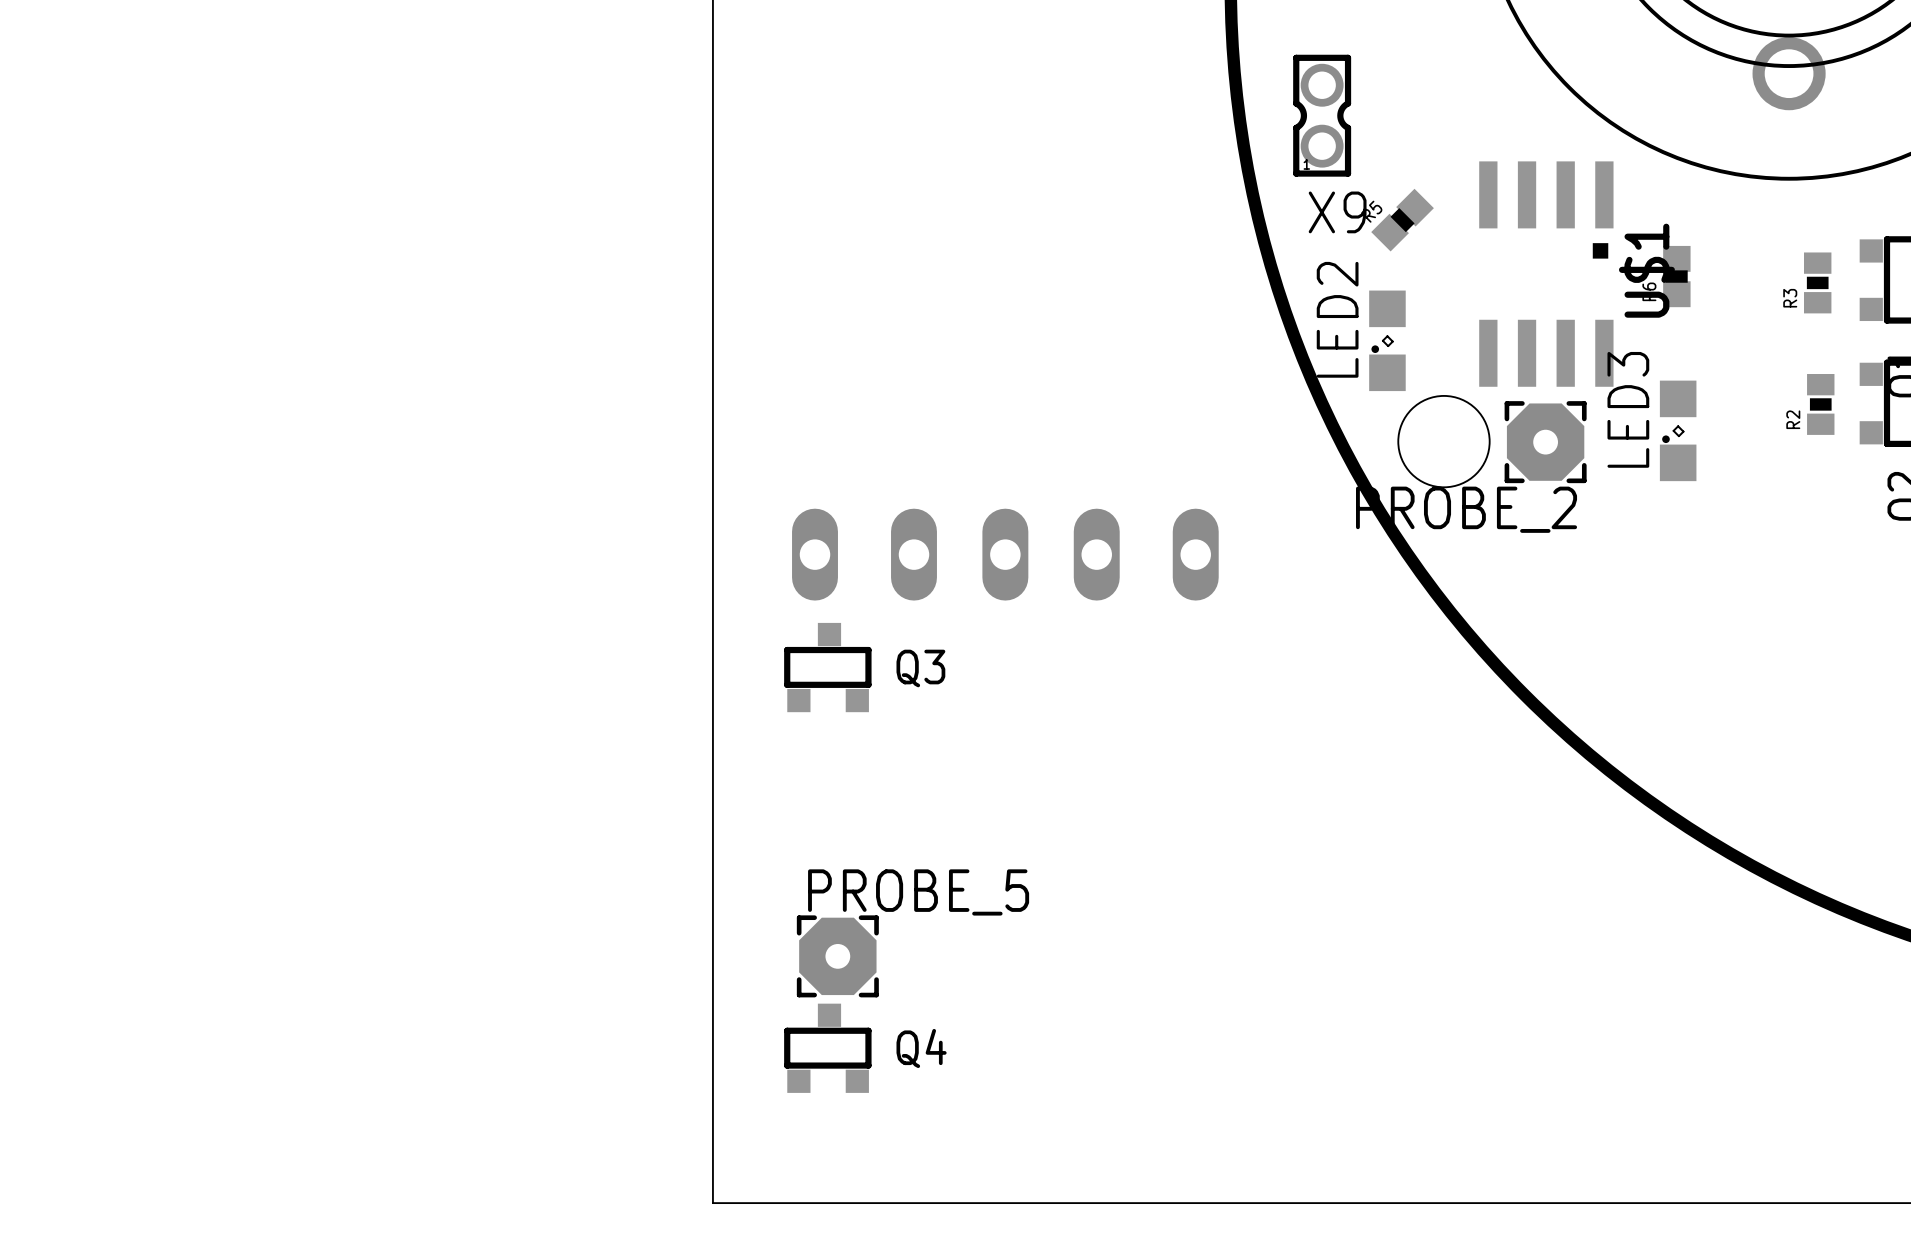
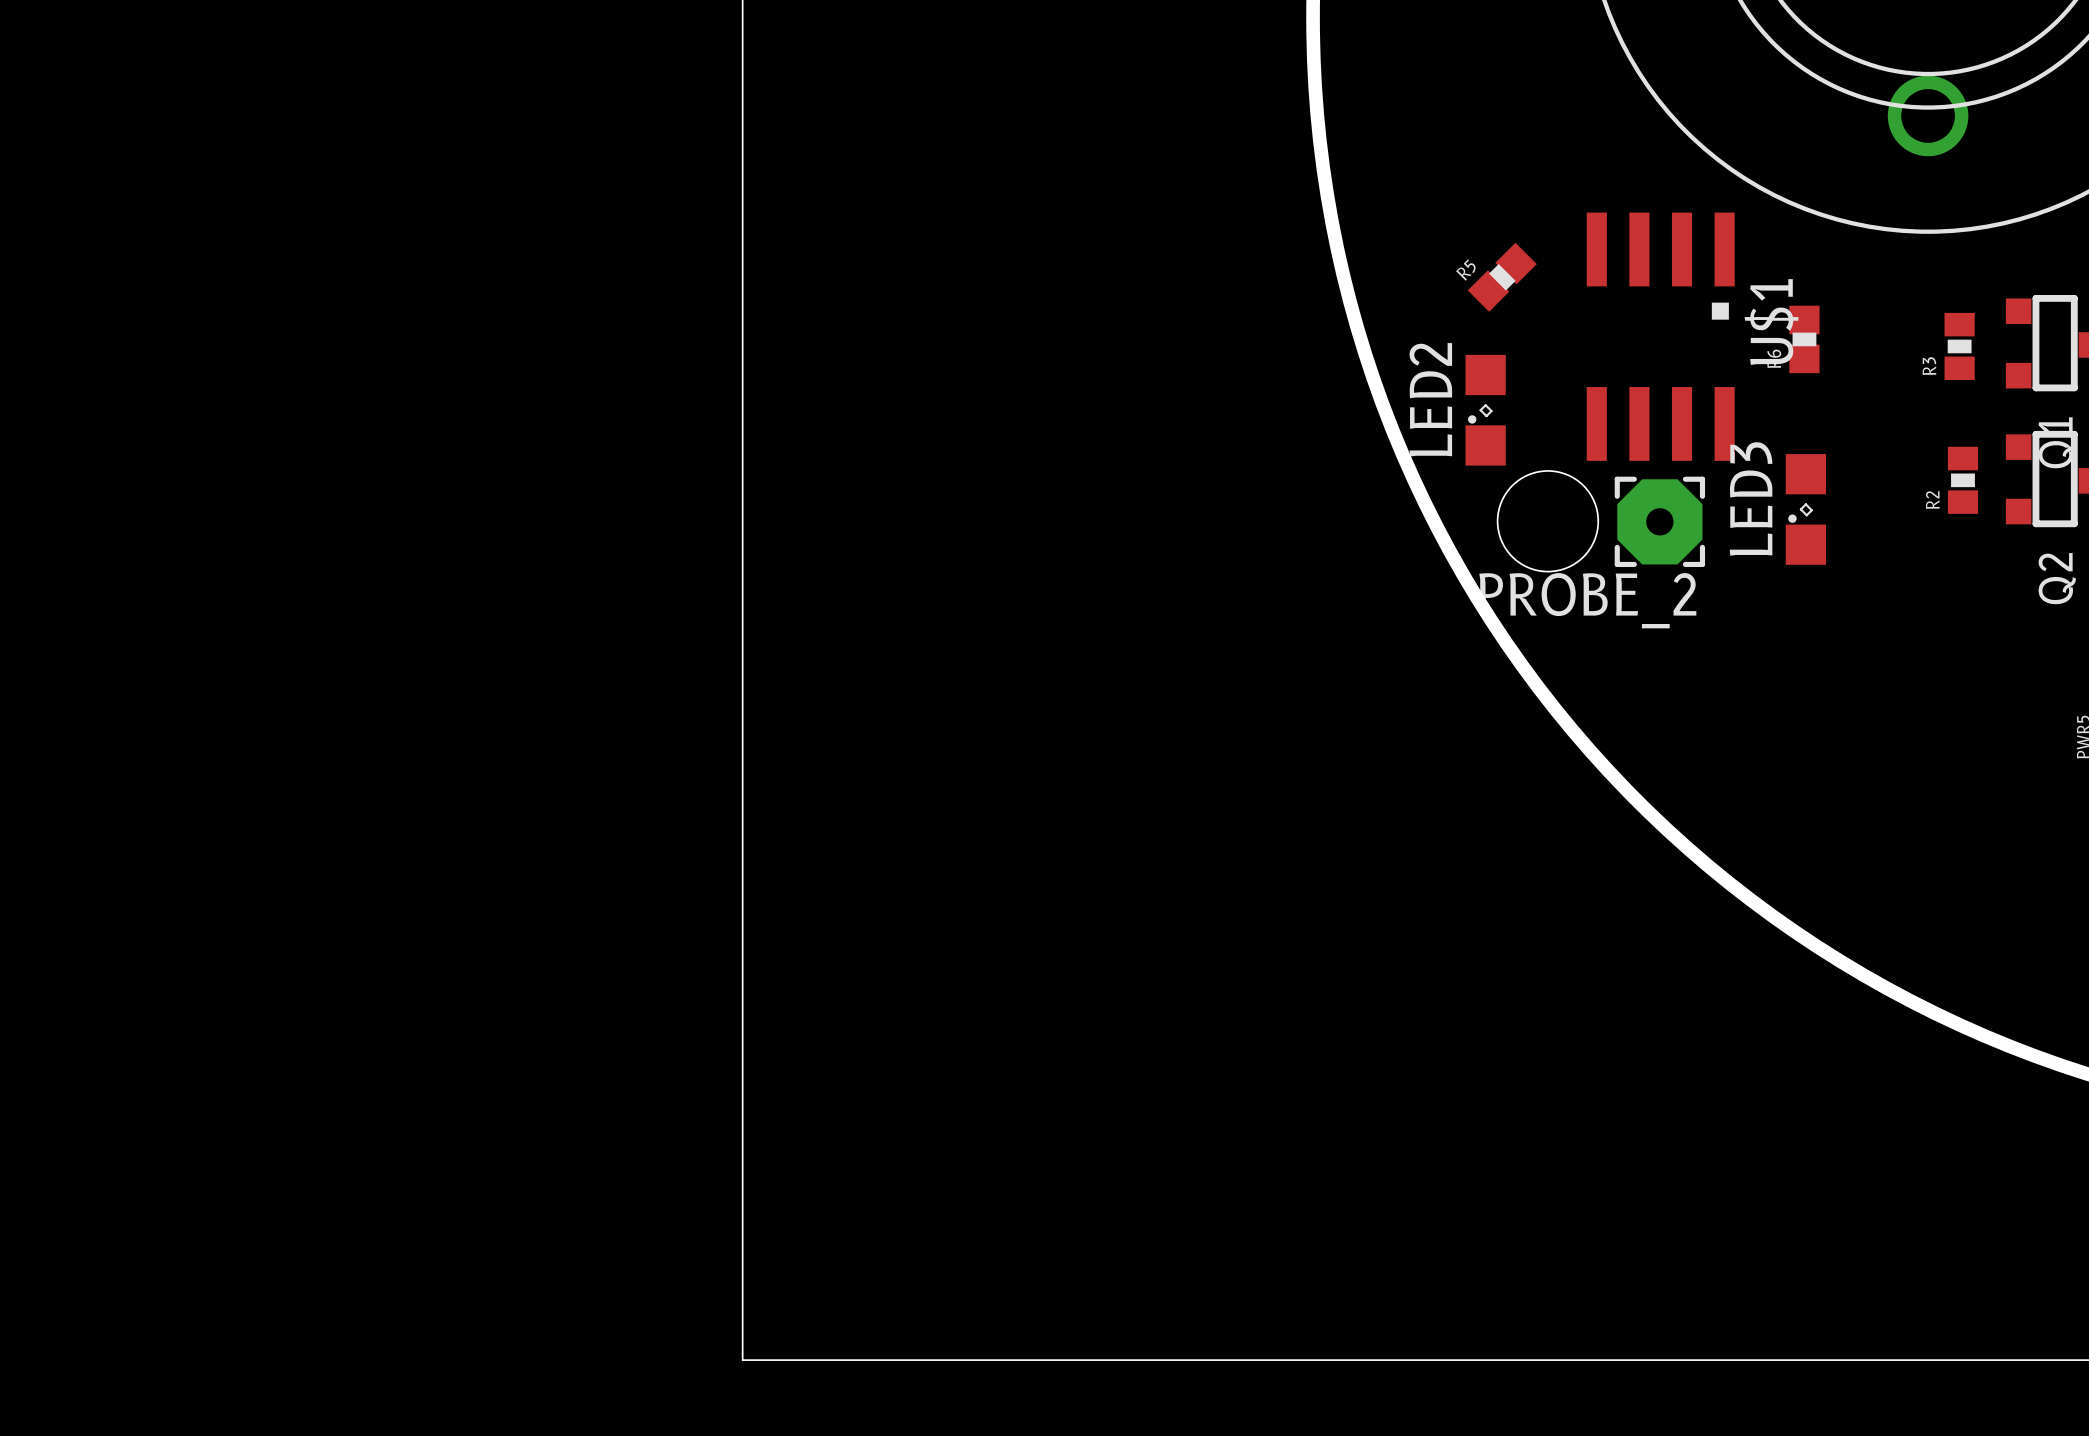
X9: (1322, 115) -> none
part: (1005, 554) -> none
Q3: (827, 667) -> none
PROBE_5: (837, 956) -> none
Q4: (827, 1048) -> none

